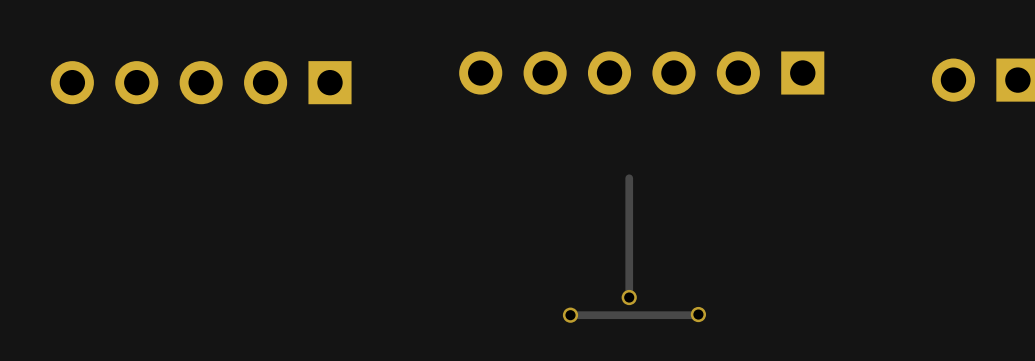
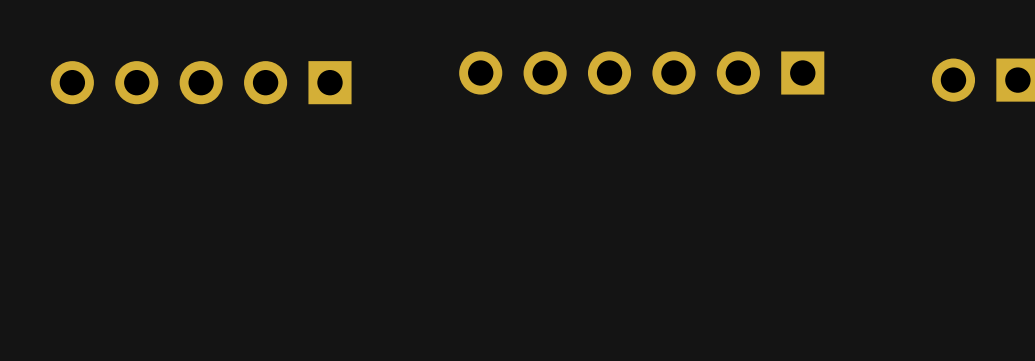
track: (629, 178) (629, 297) -> none
via: (629, 297) -> none
track: (698, 314) (570, 315) -> none
via: (698, 314) -> none
via: (570, 315) -> none

